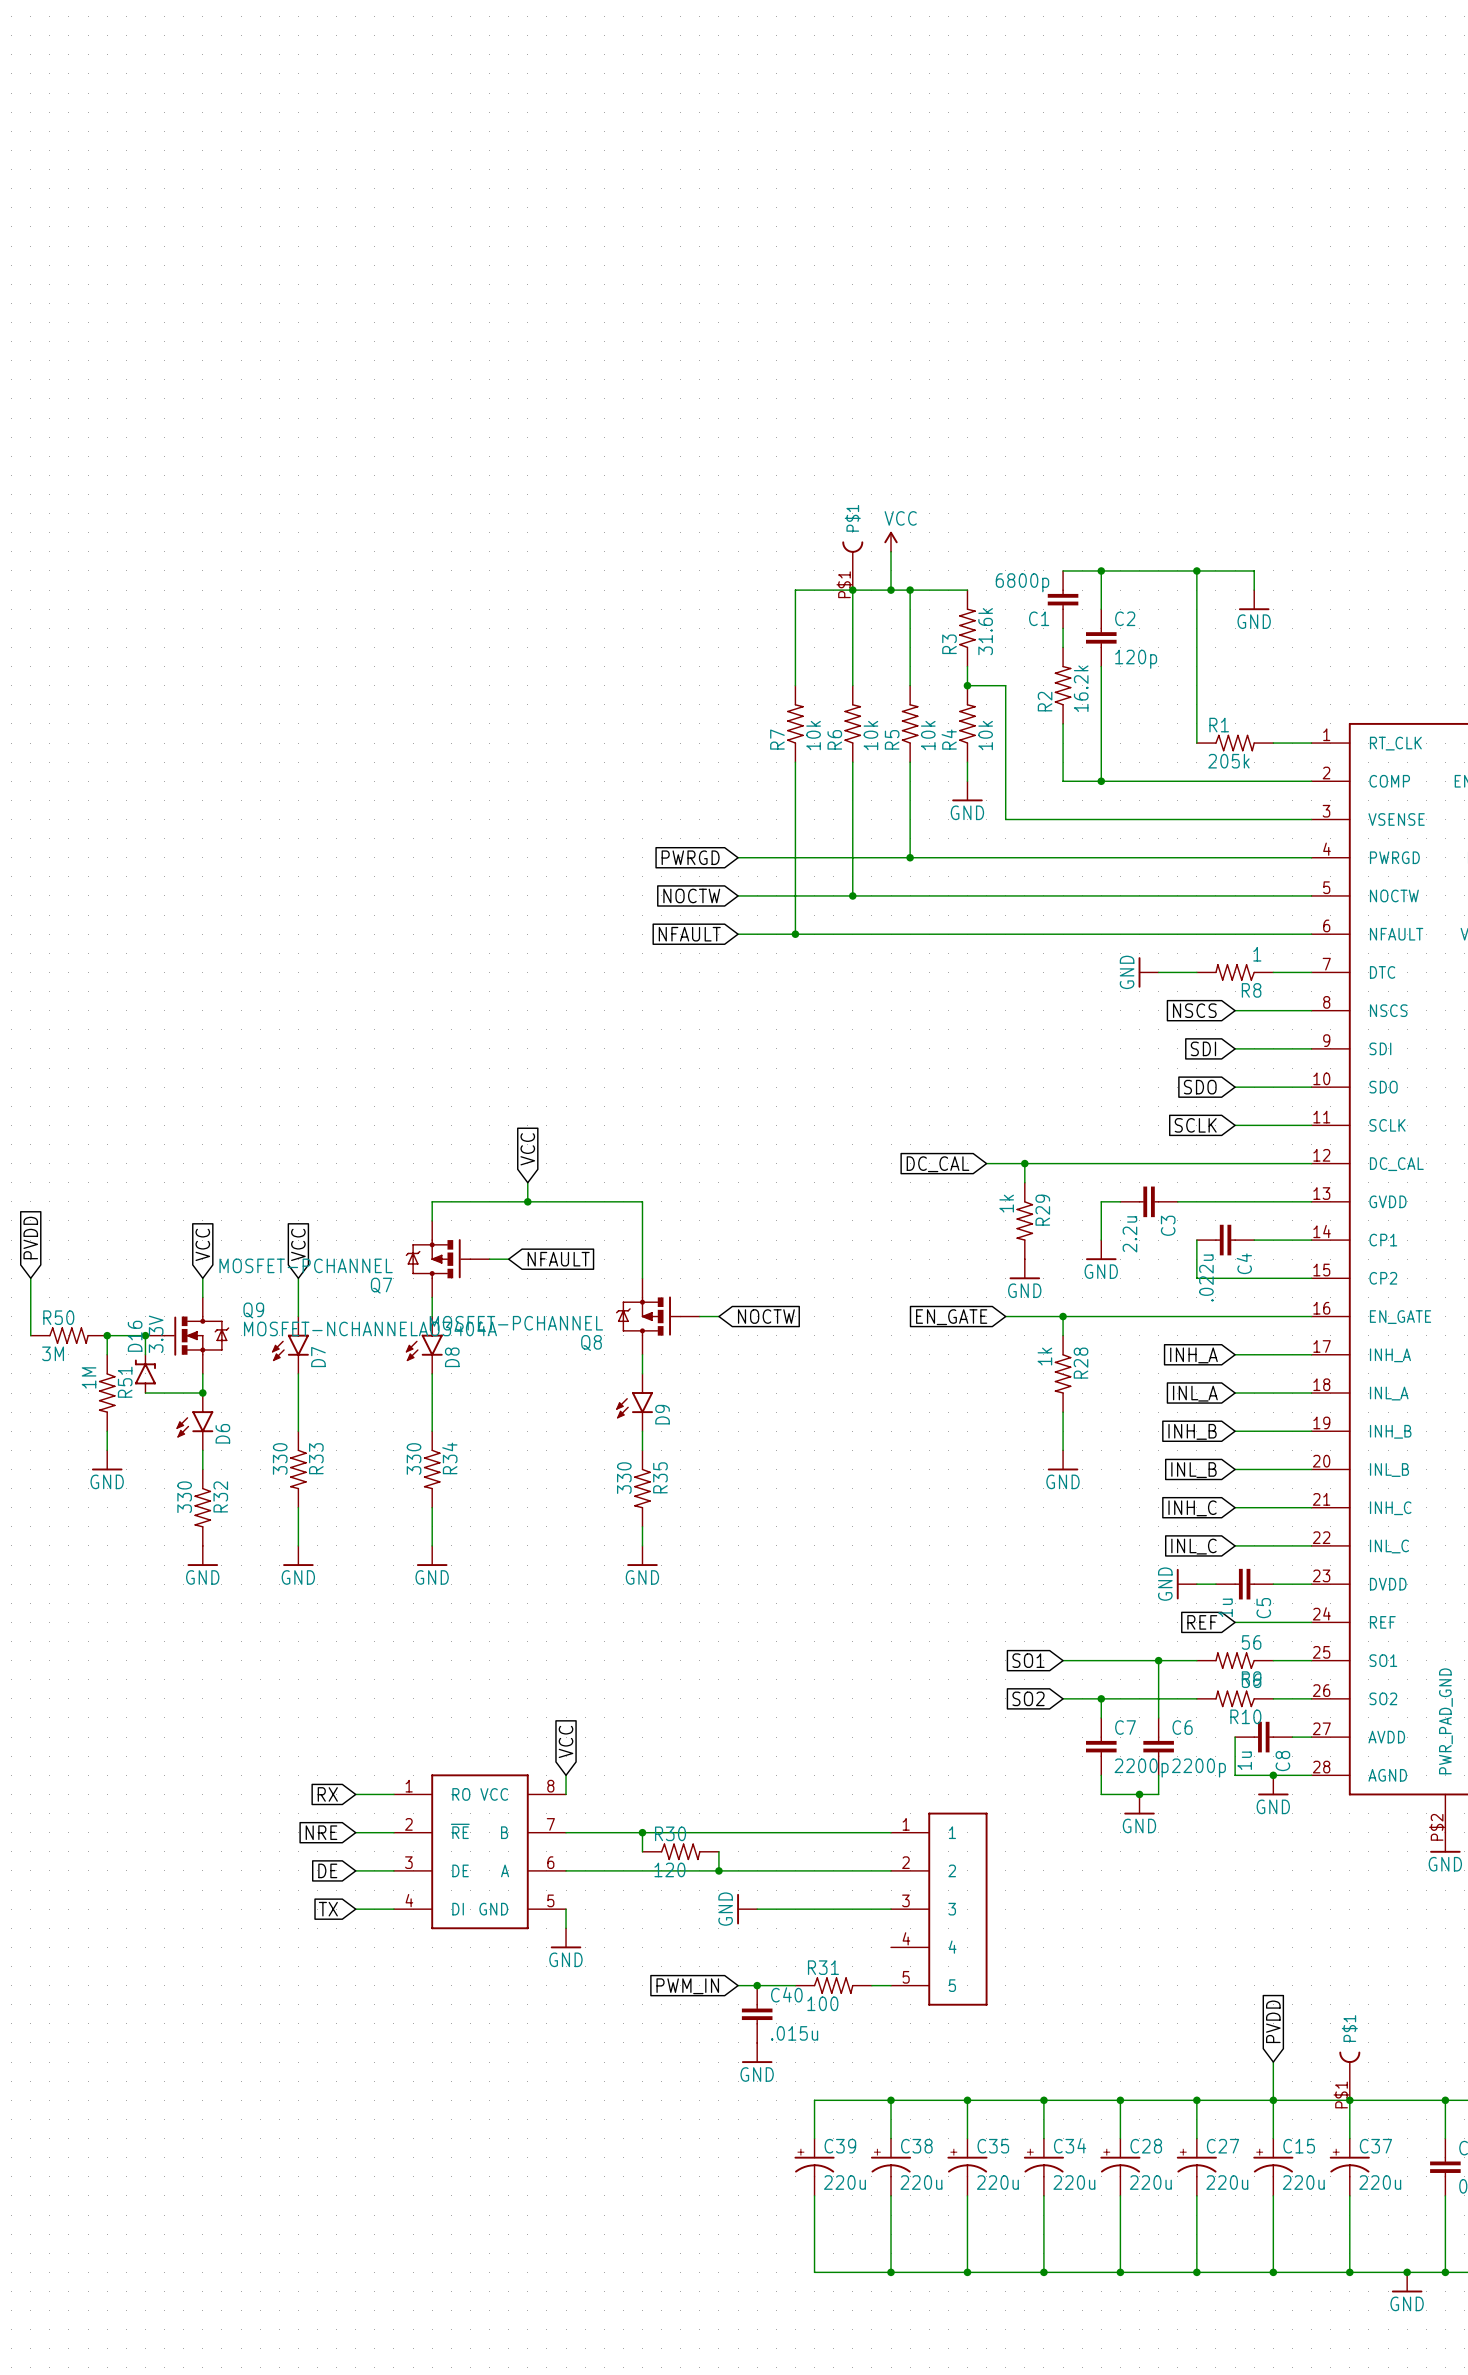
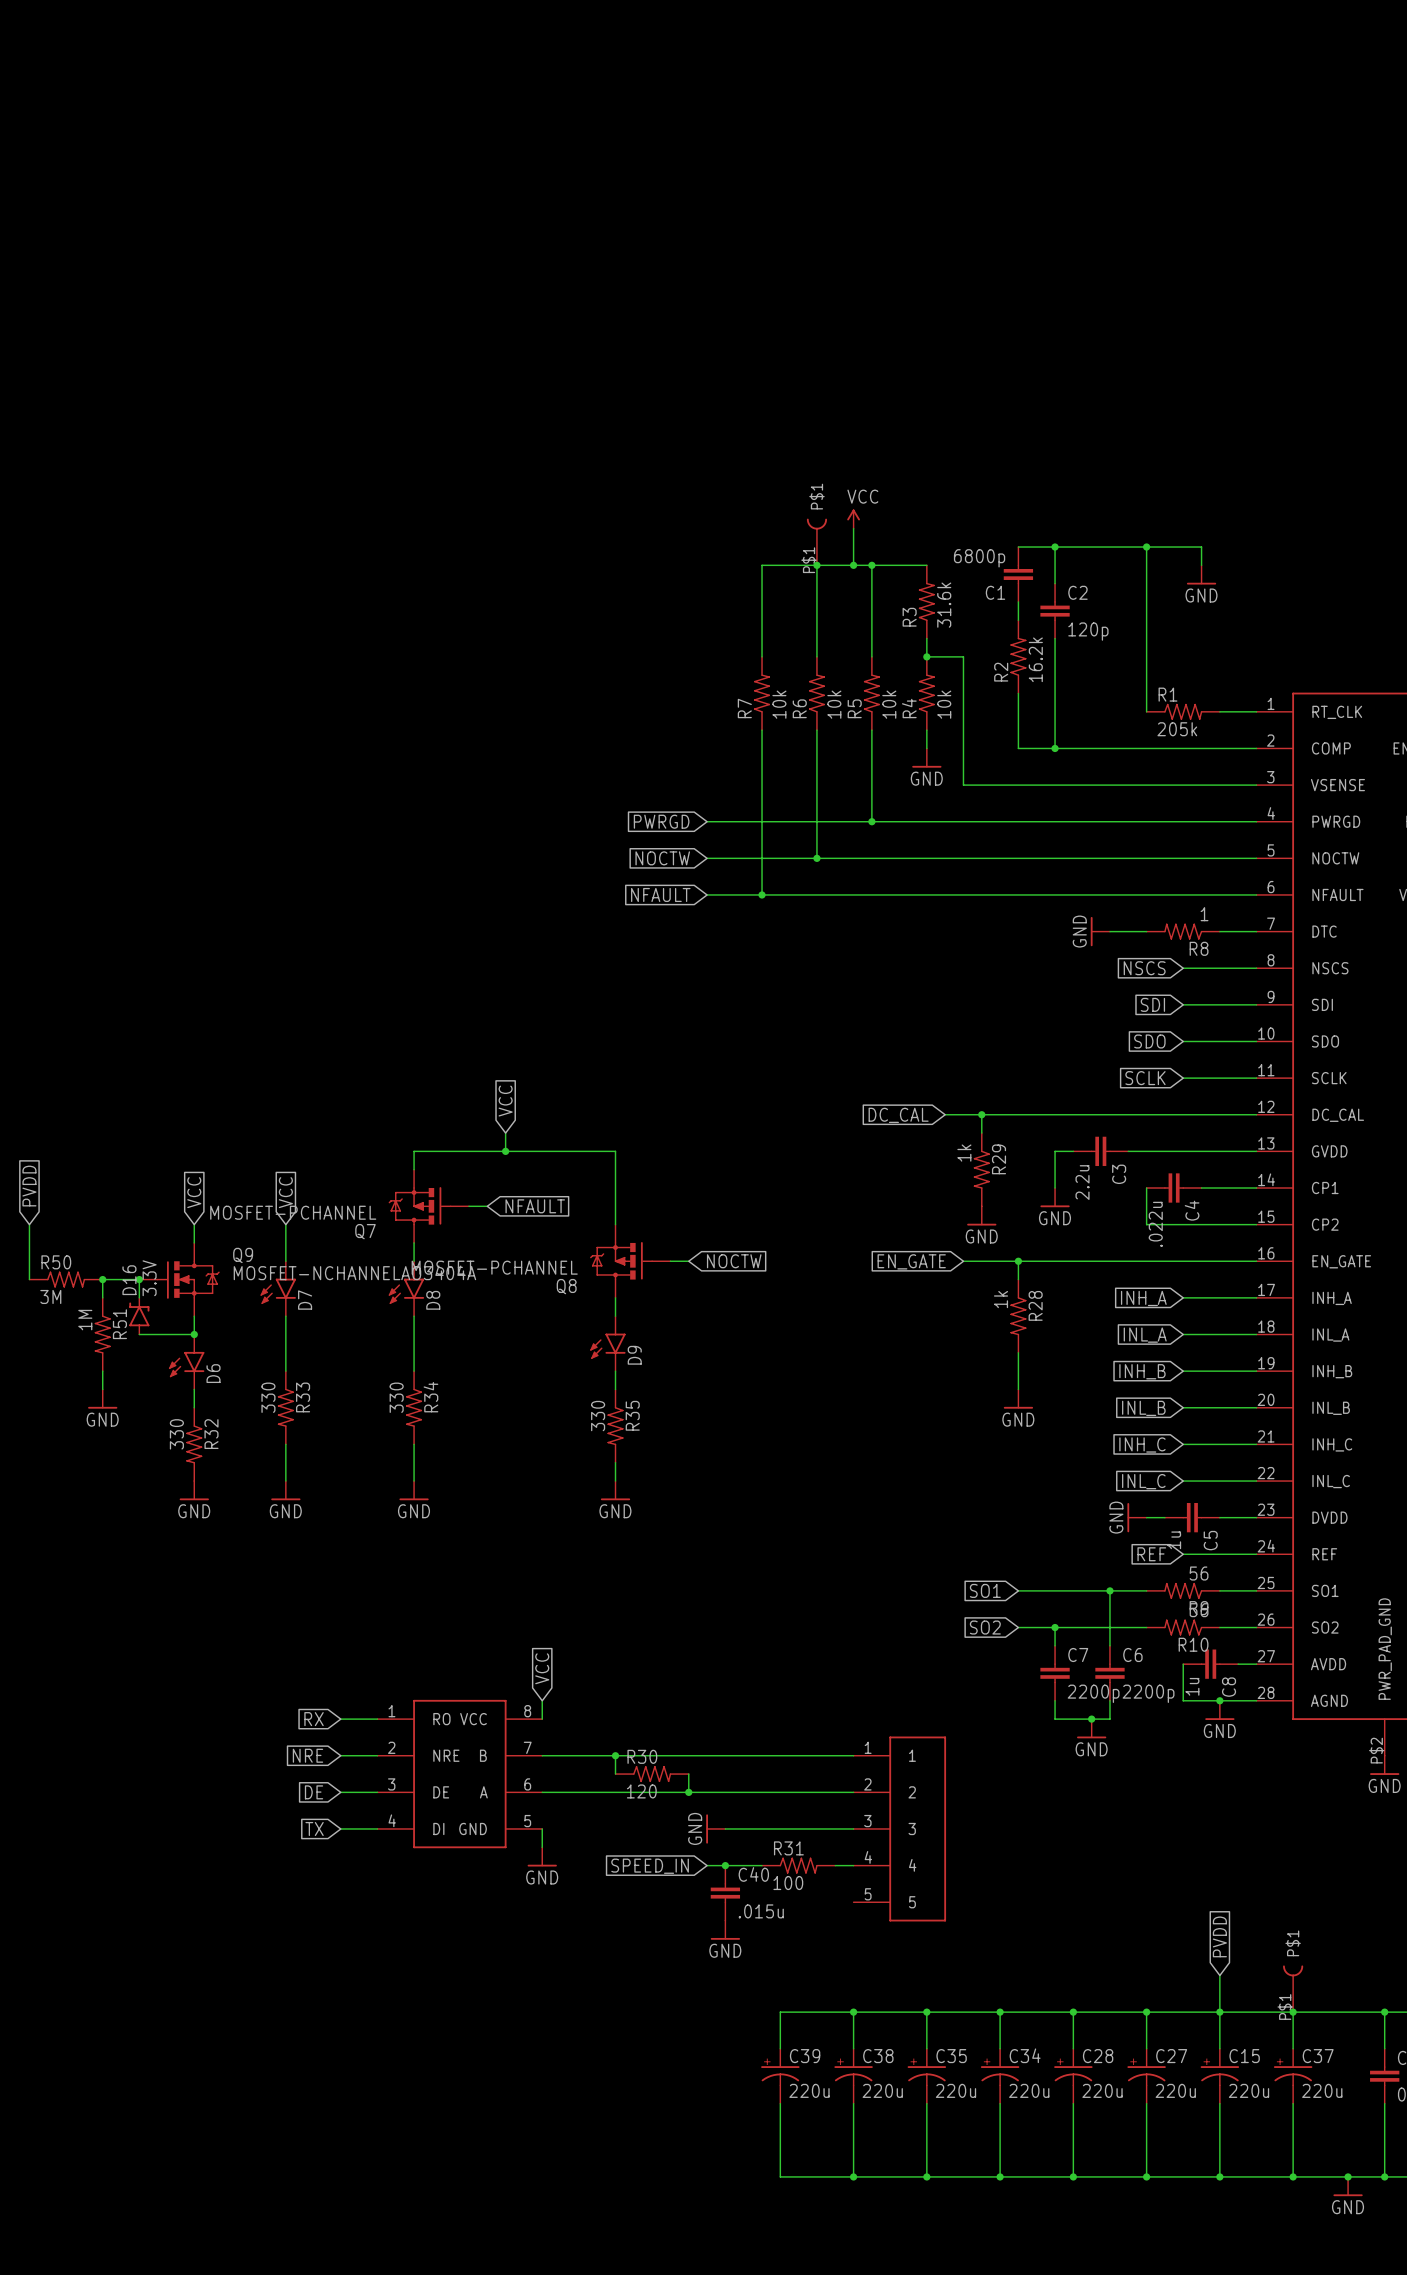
part pin name: ~{RE} (460, 1831) -> NRE (446, 1755)
global label: none -> SPEED_IN (650, 1866)
wire: (738, 1985) (795, 1985) -> (707, 1865) (762, 1865)
junction position: (757, 1985) -> (725, 1865)
R31 position: (833, 1985) -> (798, 1865)
wire: (871, 1985) (891, 1985) -> (835, 1865) (853, 1865)
global label: PWM_IN (687, 1986) -> none
C40 position: (757, 2014) -> (725, 1893)
power symbol position: GND (757, 2053) -> GND (725, 1930)

